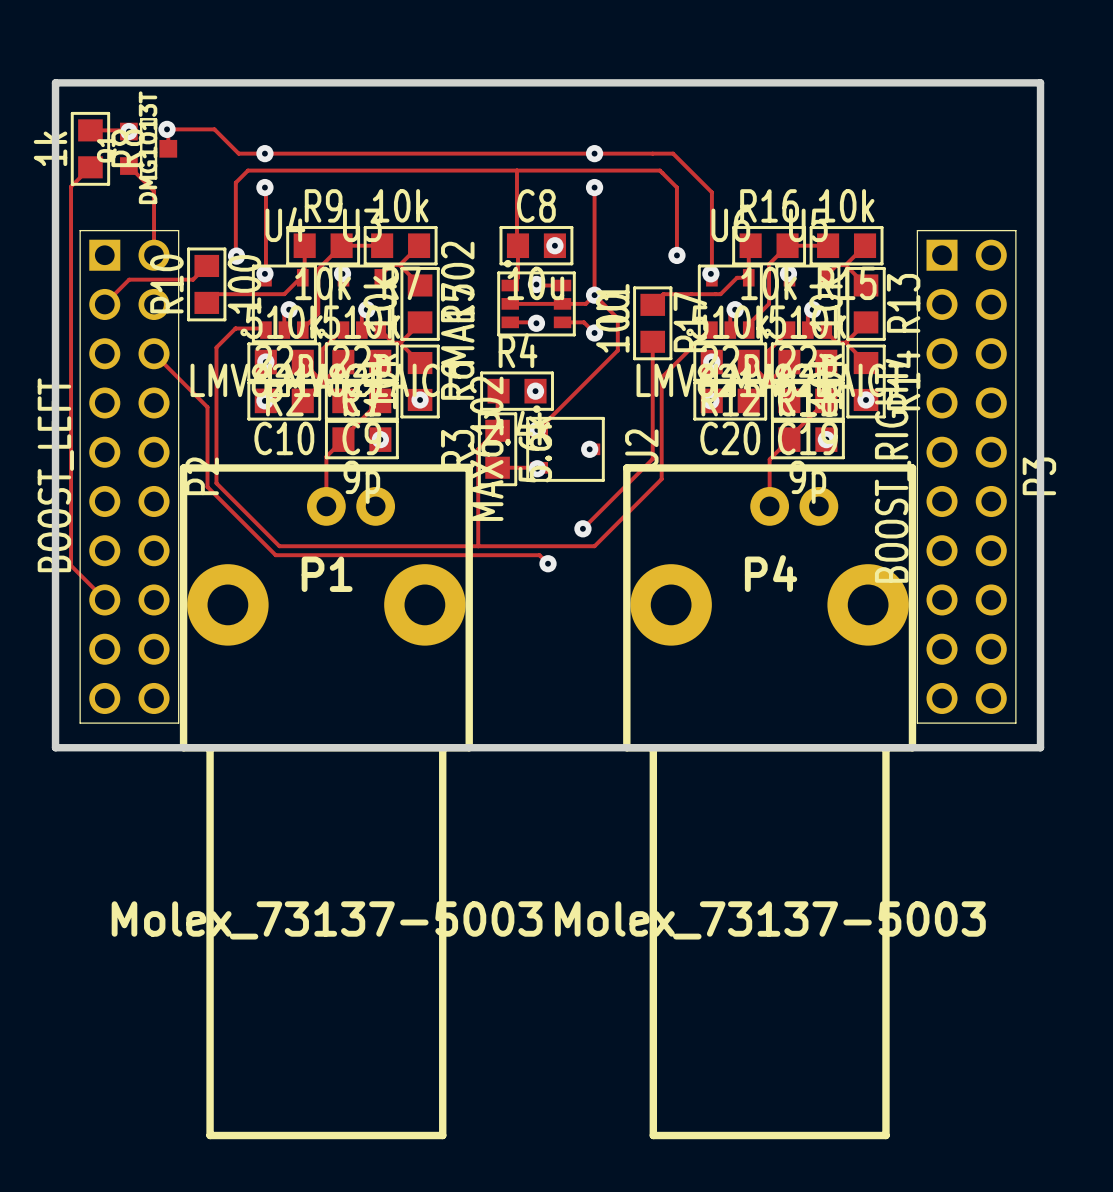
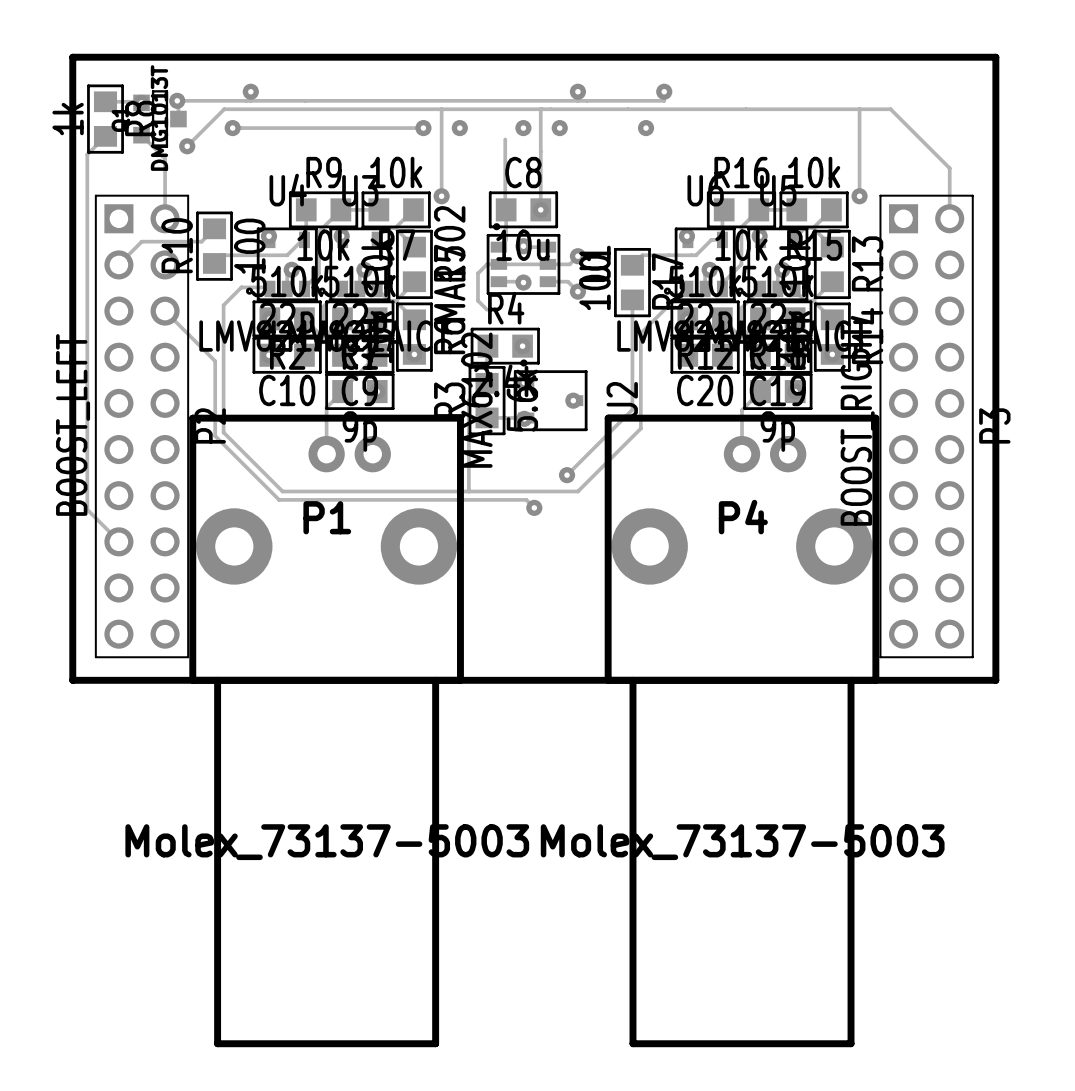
via: none -> (250, 91)
via: none -> (577, 91)
via: none -> (664, 91)
track: (214, 129) (238, 153) (673, 153) (711, 192) (711, 274) -> (221, 100) (664, 100) (664, 91)
track: none -> (441, 109) (441, 196)
track: none -> (540, 109) (540, 209)
track: none -> (859, 109) (859, 196)
via: (264, 153) -> none
via: (594, 153) -> none
track: none -> (232, 128) (423, 128)
via: none -> (232, 128)
via: none -> (423, 128)
via: none -> (459, 128)
via: none -> (523, 128)
via: none -> (559, 128)
via: none -> (646, 128)
track: none -> (187, 146) (224, 109) (890, 109) (949, 168) (949, 218)
via: none -> (187, 146)
track: (264, 187) (265, 274) -> none
via: (264, 187) -> none
track: (594, 187) (594, 295) (617, 318) (617, 350) (539, 430) (537, 429) -> none
via: (594, 187) -> none
via: none -> (441, 196)
via: none -> (859, 196)
track: (676, 255) (676, 187) (659, 170) (247, 170) (235, 182) (236, 256) -> none
via: (676, 255) -> none
via: (236, 256) -> none
track: none -> (498, 264) (487, 264) (478, 273) (478, 300) (487, 309)

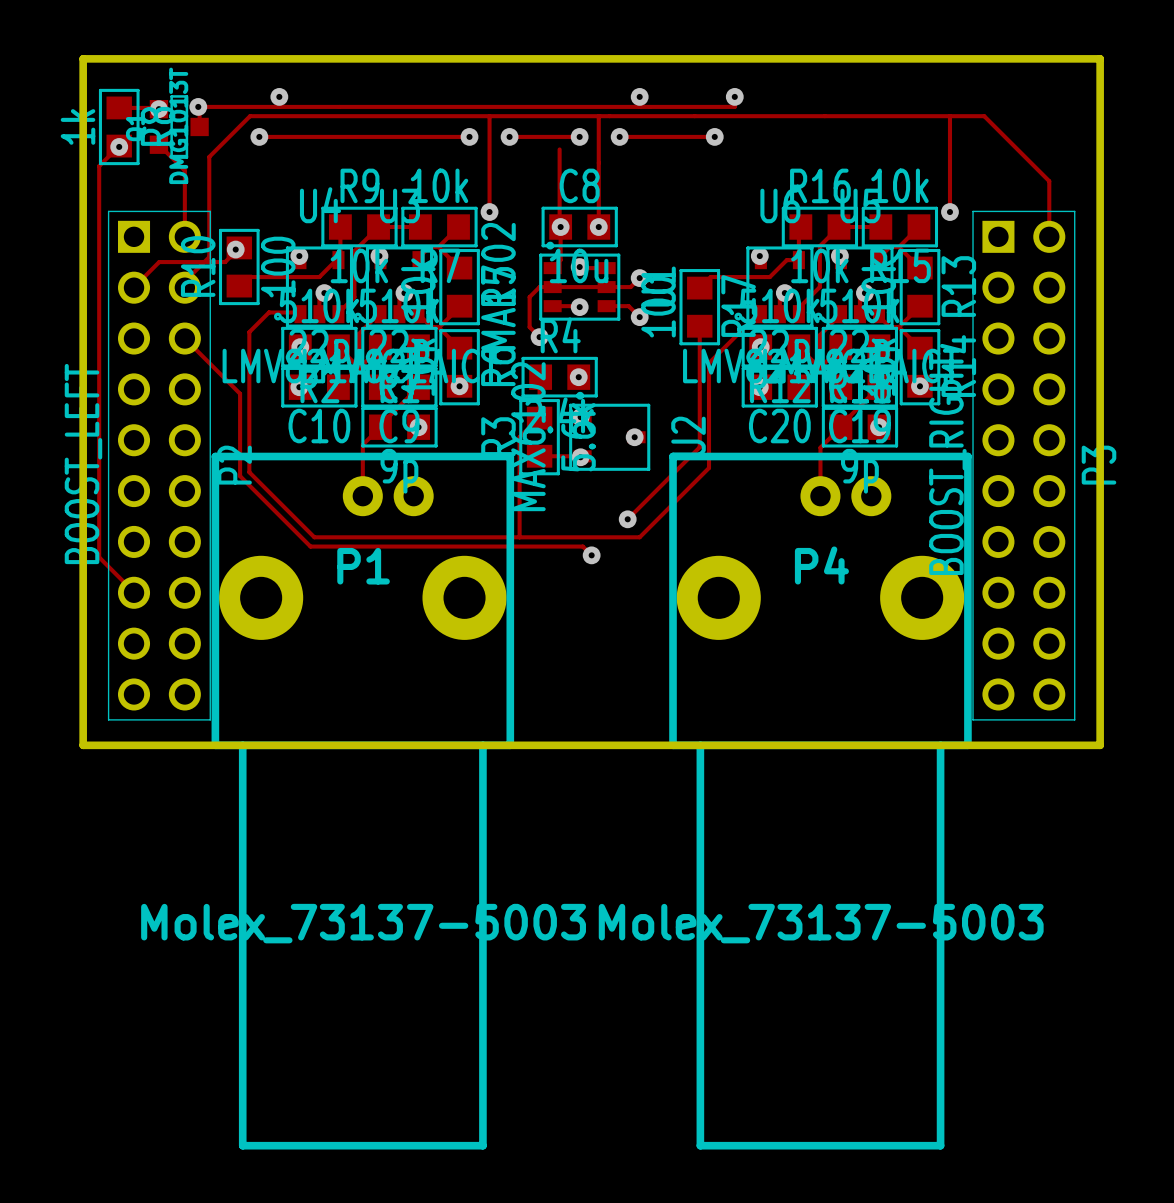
track: none -> (509, 136) (579, 136)
track: none -> (619, 136) (714, 136)
via: none -> (119, 146)
track: none -> (209, 156) (209, 257) (184, 281) (184, 287)
via: (187, 146) -> none
via: none -> (560, 227)
via: none -> (235, 249)
via: none -> (539, 337)

